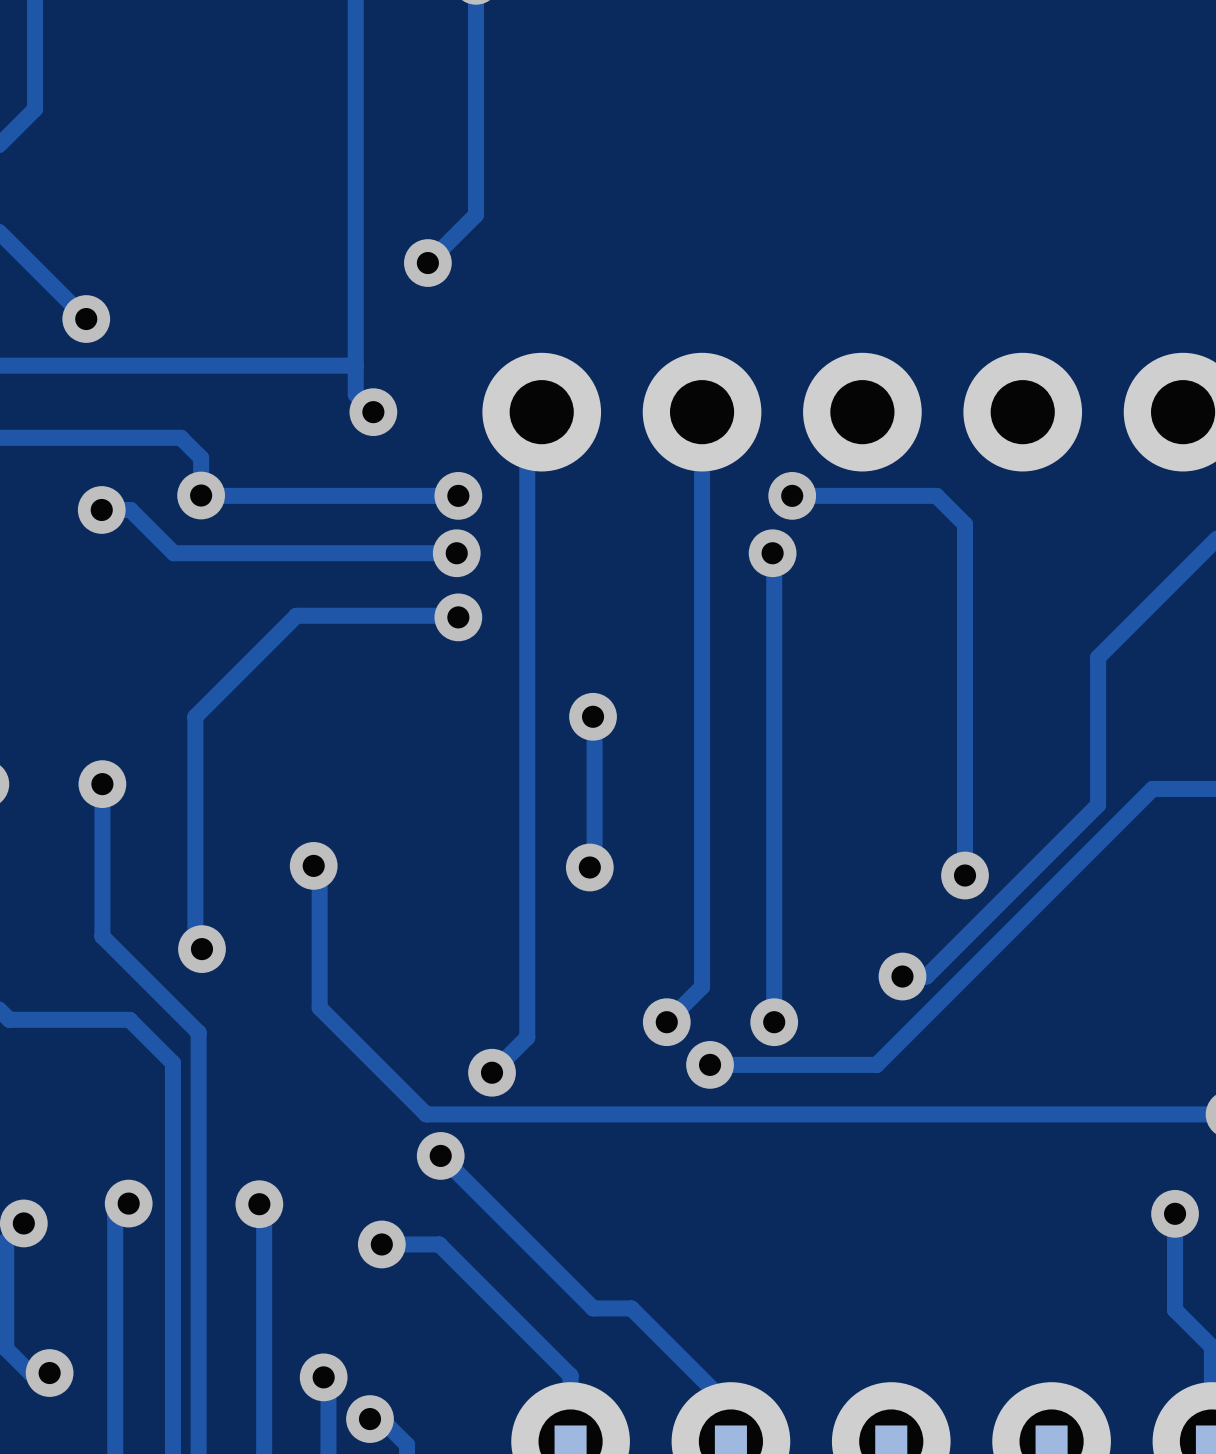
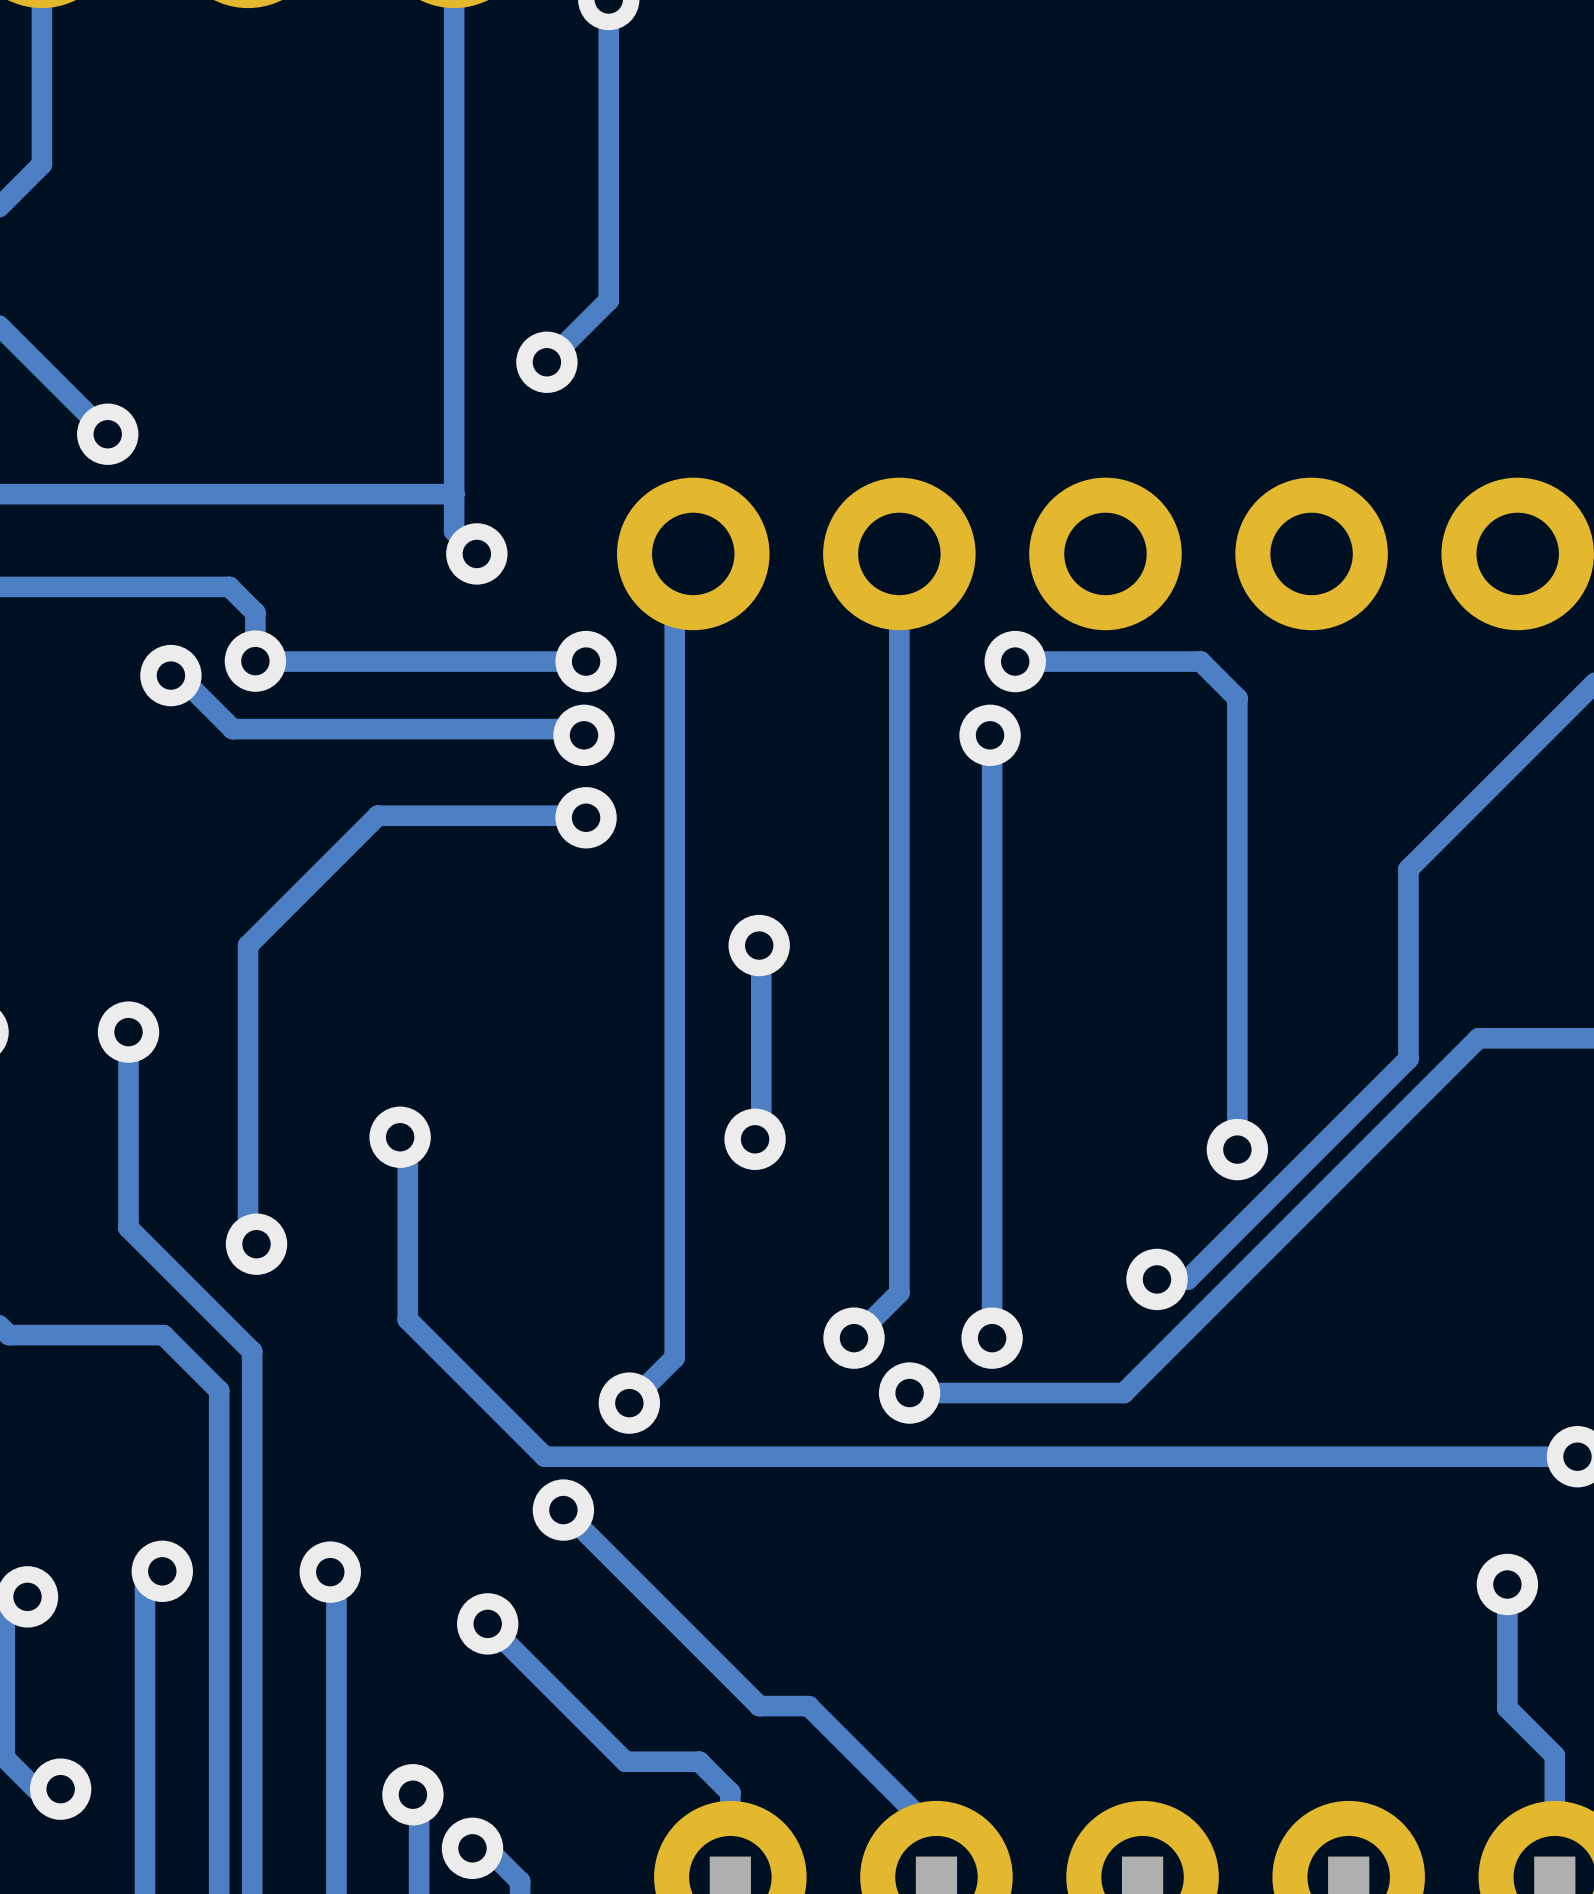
track: (101, 509) (130, 509) (173, 553) (456, 553) -> (170, 675) (179, 675) (232, 729) (577, 729) (584, 735)
via position: (101, 509) -> (170, 675)
track: (381, 1244) (439, 1244) (546, 1351) -> (487, 1623) (625, 1761) (699, 1761)

